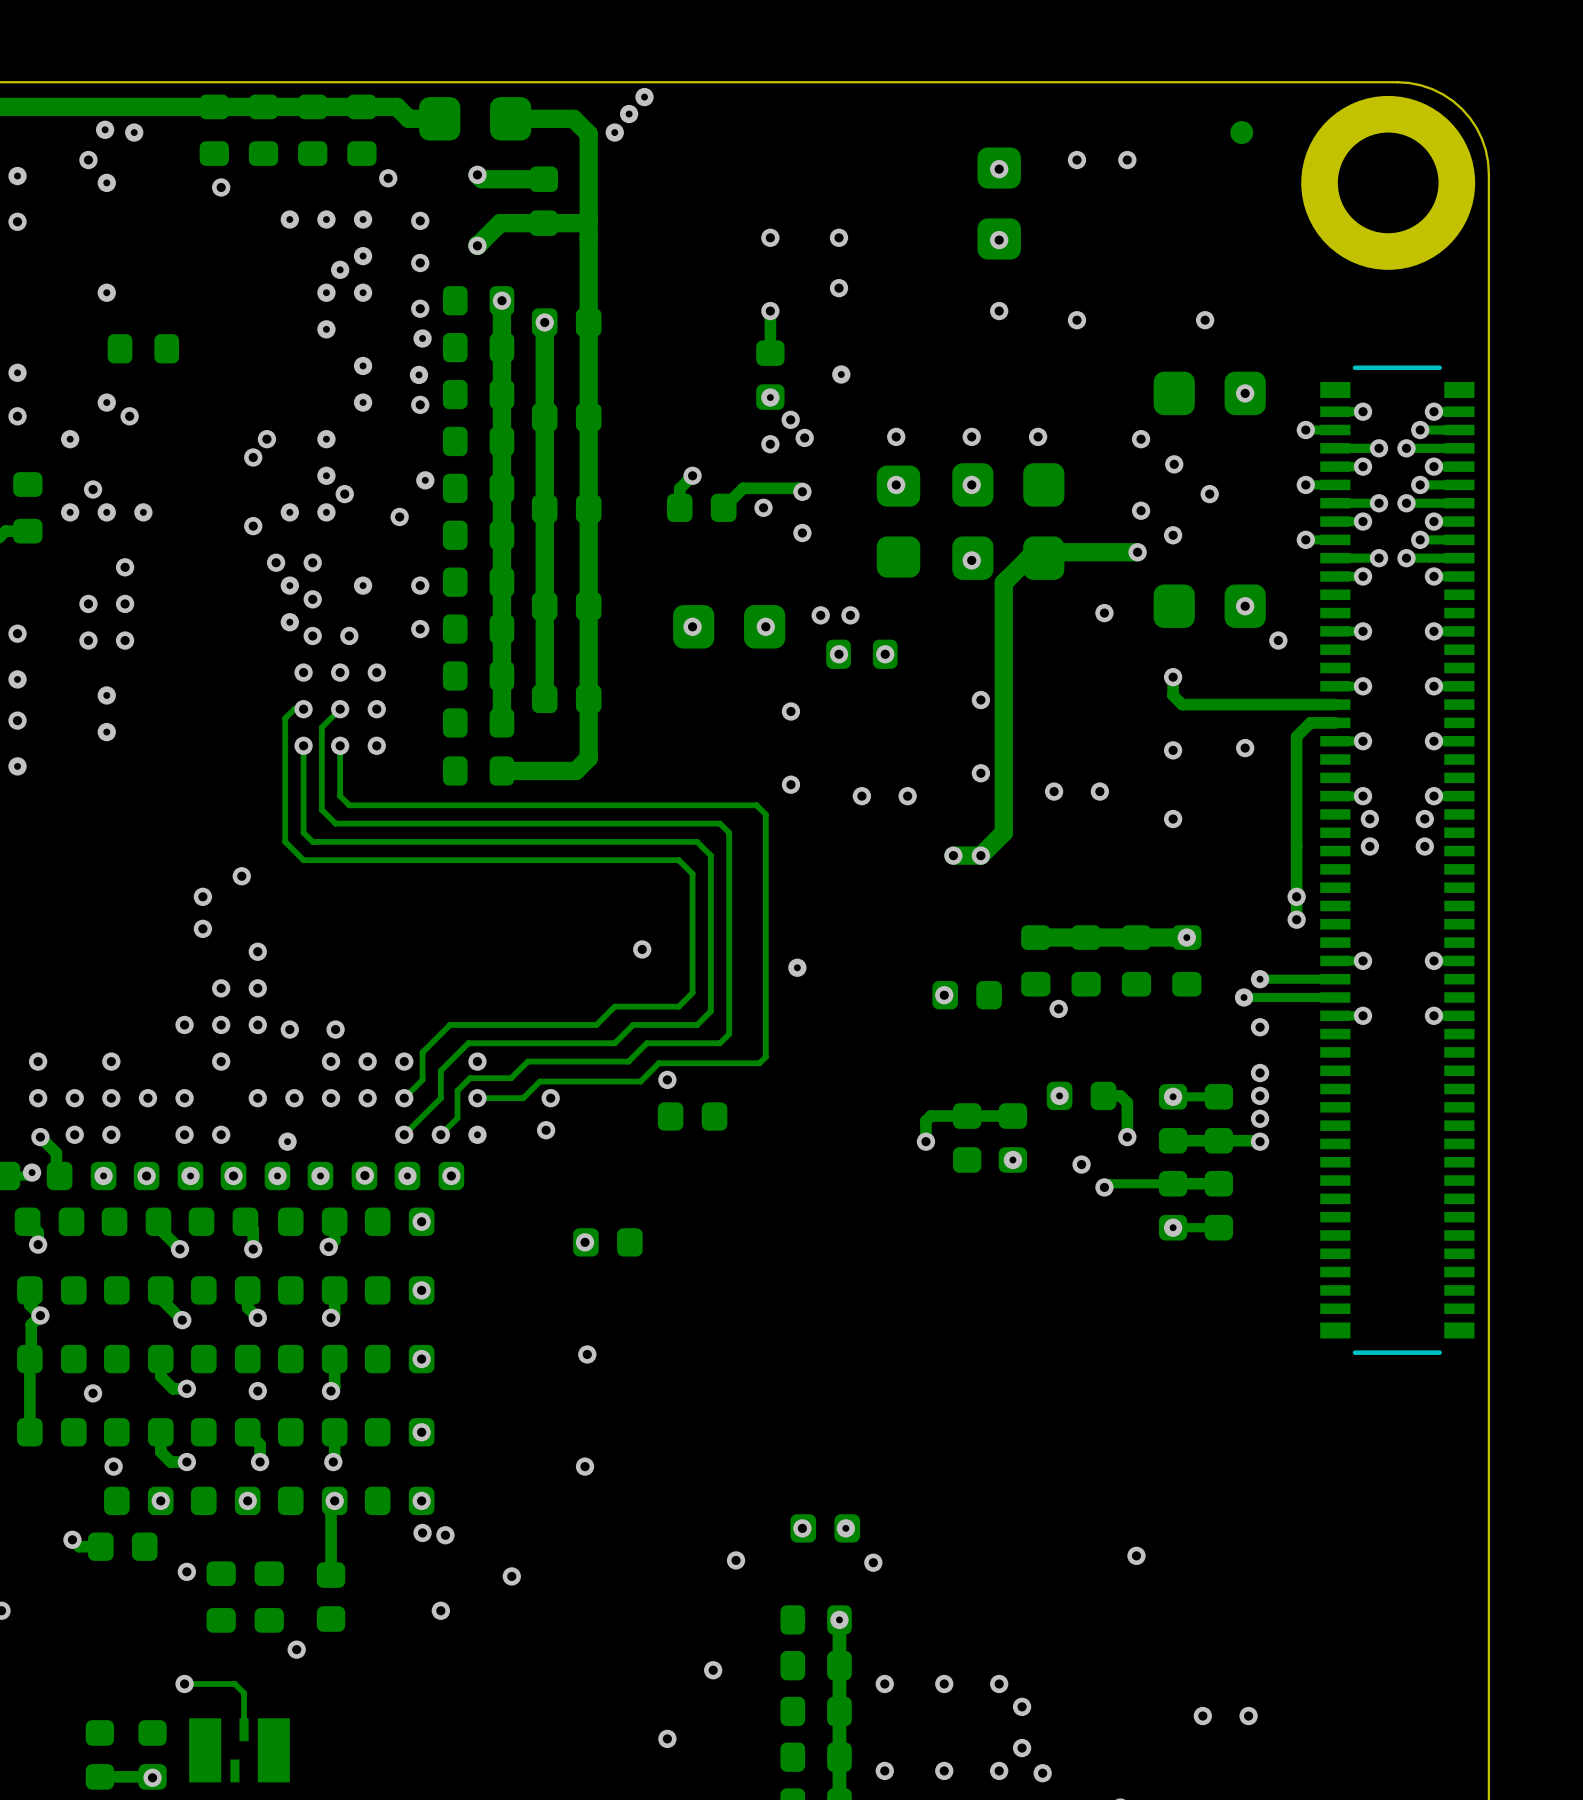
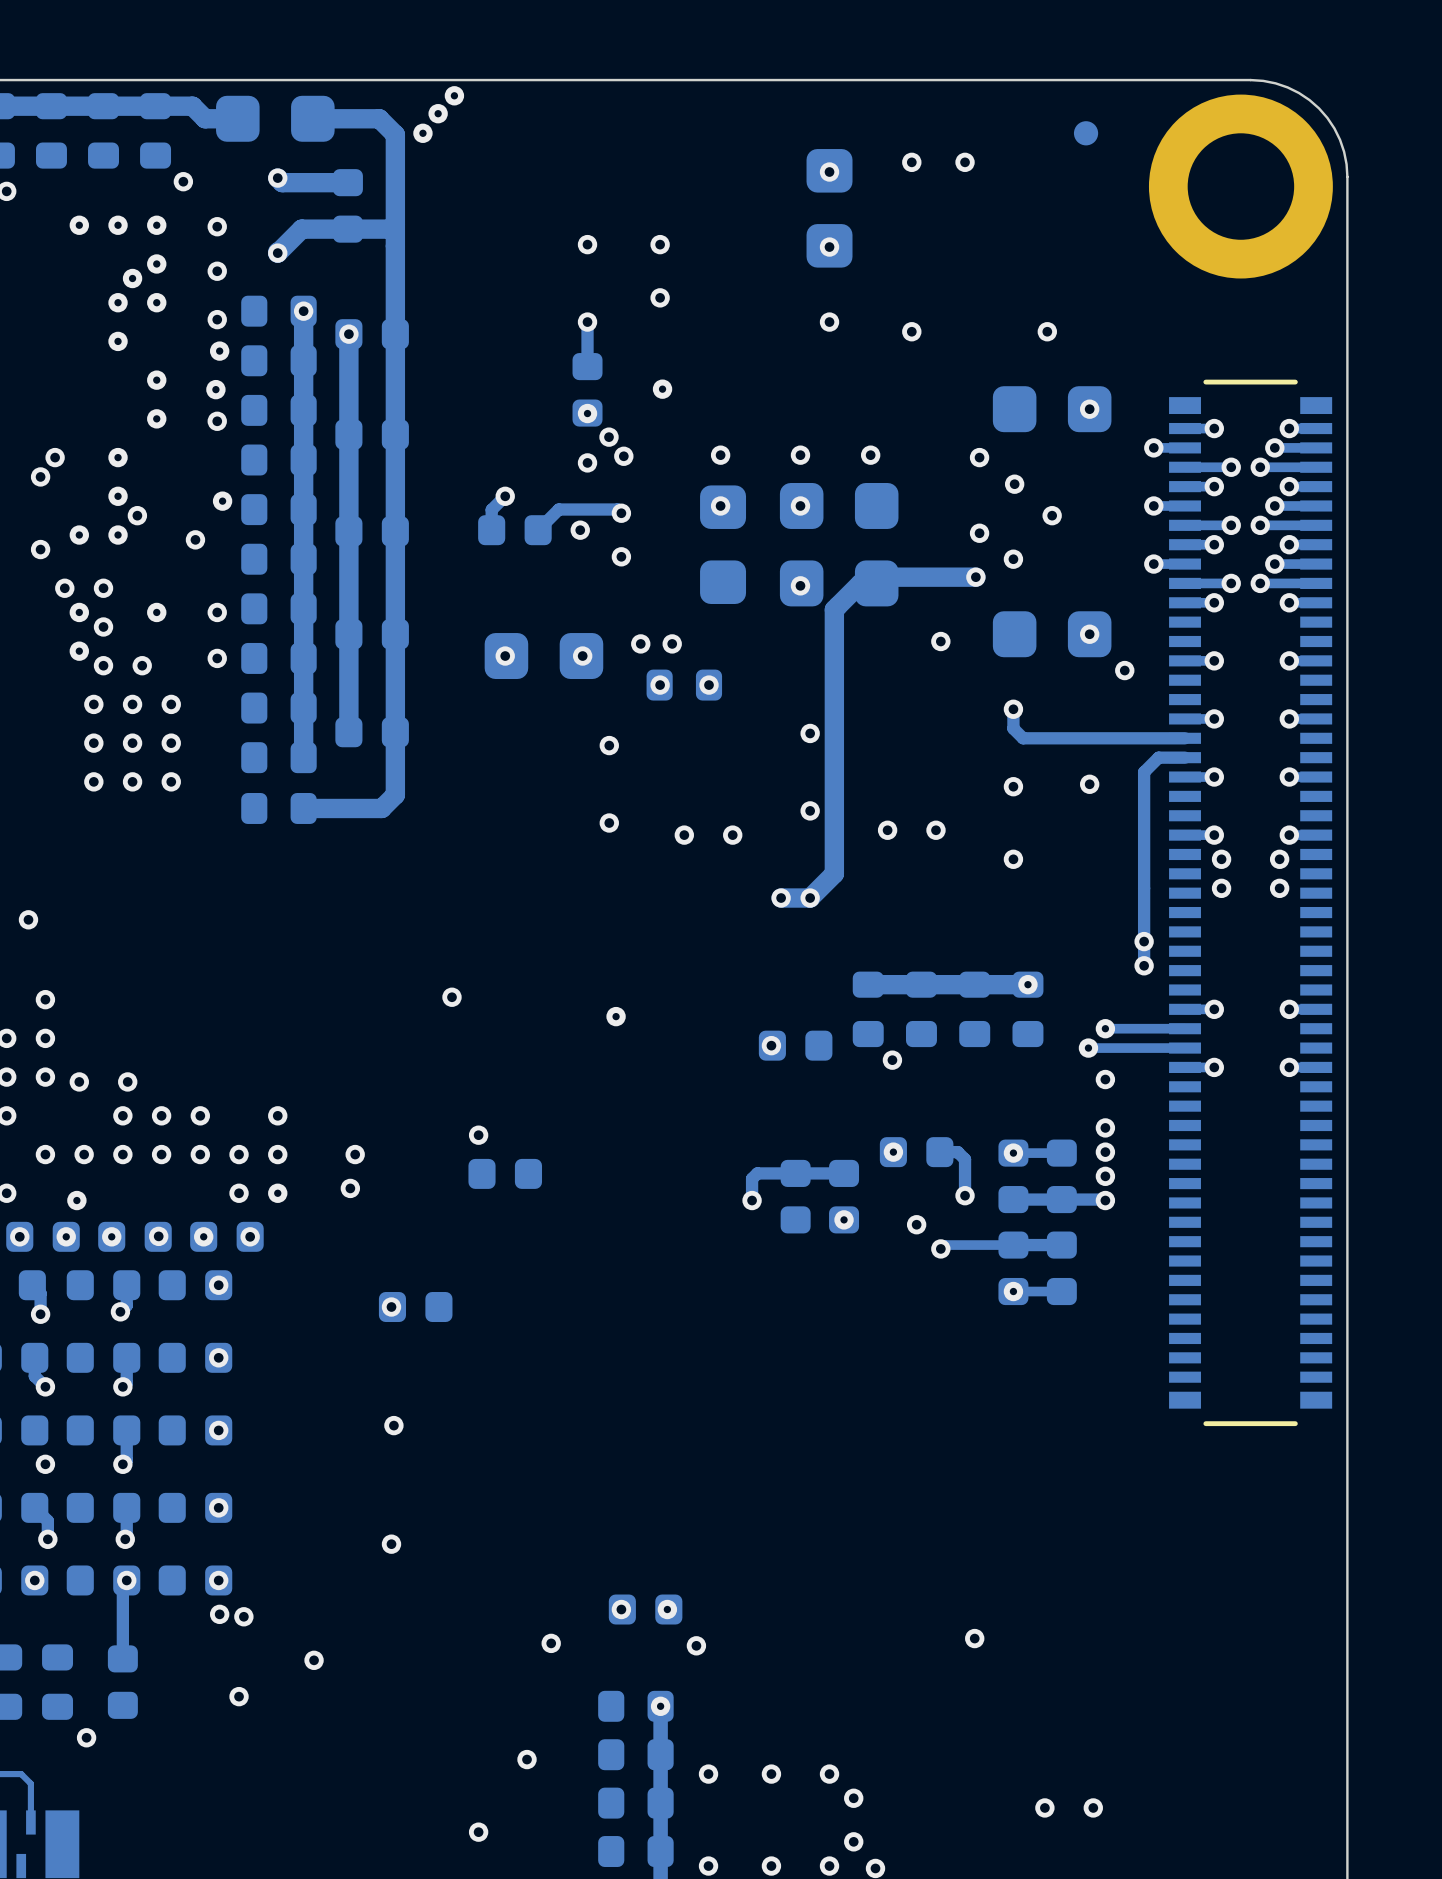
track: (303, 709) (294, 709) (285, 718) (285, 841) (303, 860) (678, 860) (692, 873) (692, 992) (678, 1006) (614, 1006) (596, 1024) (450, 1024) (422, 1052) (422, 1079) (404, 1098) -> none
track: (340, 709) (321, 727) (321, 809) (335, 823) (720, 823) (729, 832) (729, 1034) (720, 1043) (646, 1043) (628, 1061) (527, 1061) (511, 1078) (469, 1078) (457, 1090) (457, 1118) (440, 1134) -> none
track: (303, 745) (303, 832) (312, 841) (697, 841) (710, 855) (710, 1011) (697, 1024) (633, 1024) (614, 1043) (468, 1043) (440, 1070) (440, 1098) (404, 1134) -> none
track: (340, 745) (340, 796) (349, 805) (756, 805) (765, 814) (765, 1057) (759, 1063) (658, 1063) (640, 1081) (539, 1081) (523, 1098) (477, 1098) -> none
via position: (404, 1134) -> (239, 1154)

